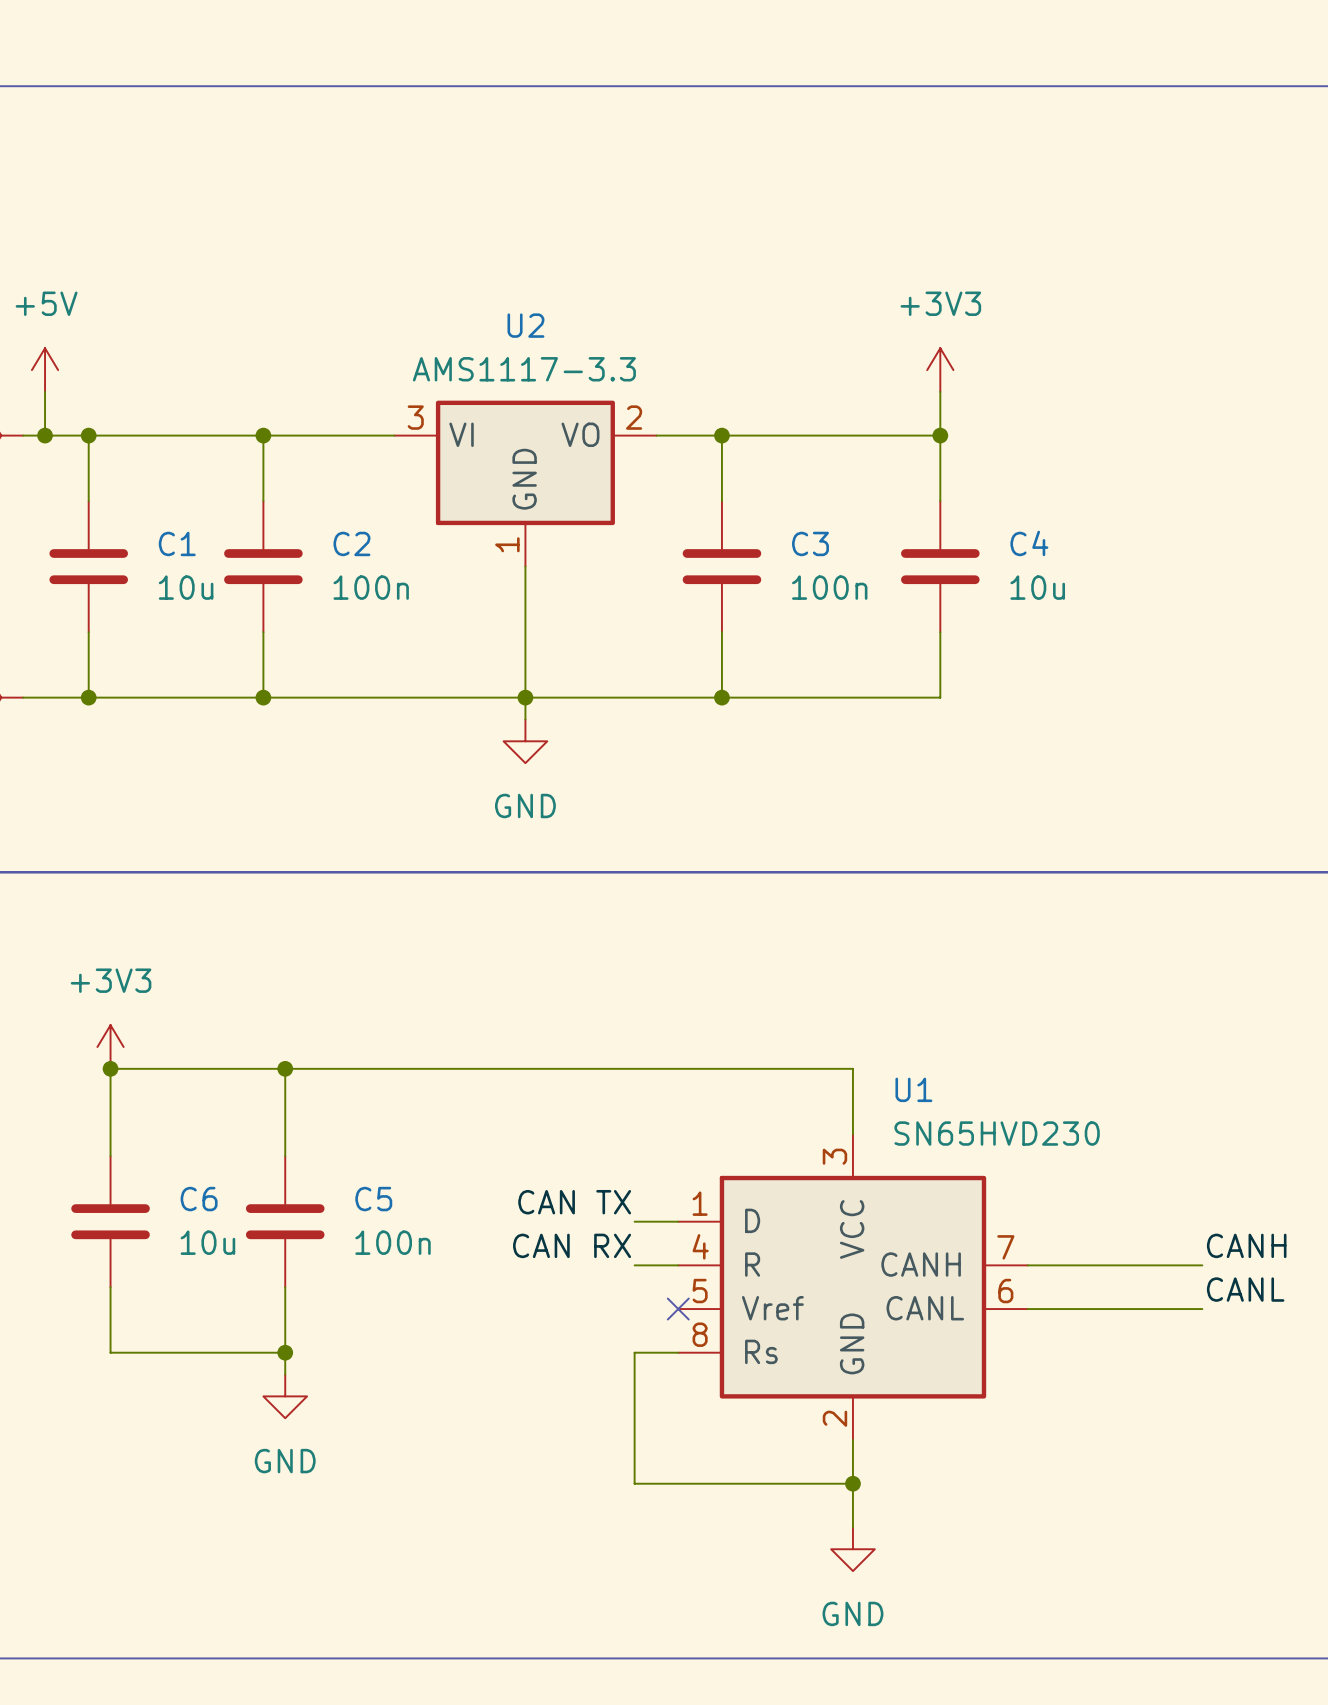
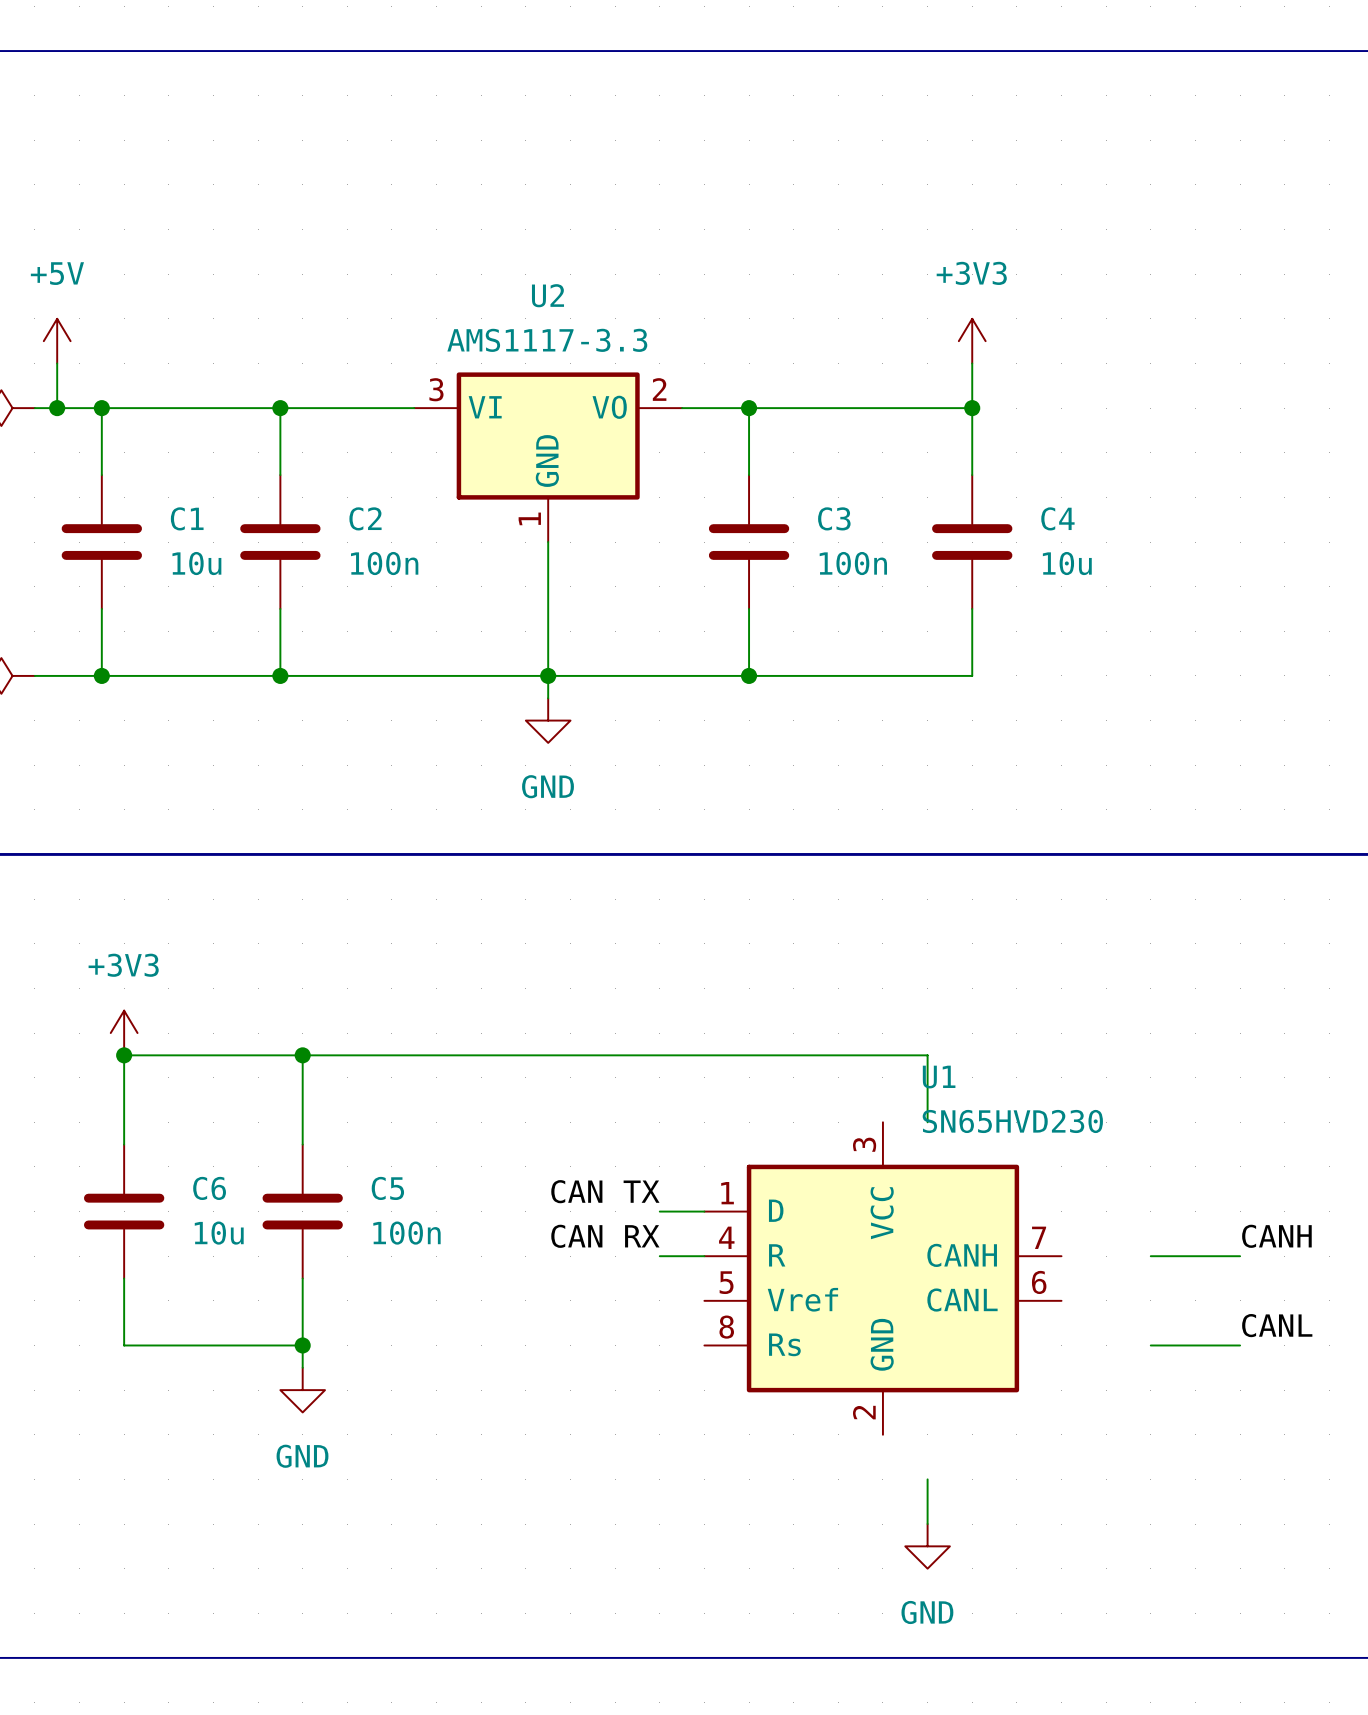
wire: (852, 1068) (852, 1134) -> (882, 1055) (927, 1055) (927, 1122)
wire: (1027, 1265) (1115, 1265) -> (1150, 1345) (1240, 1345)
label position: CANL (1245, 1289) -> CANL (1277, 1325)
no-connect mark: (678, 1309) -> none
wire: (1027, 1309) (1202, 1309) -> none
wire: (678, 1352) (634, 1352) (634, 1483) (852, 1483) -> none
wire: (852, 1440) (852, 1527) -> none
junction: (852, 1483) -> none
wire: none -> (927, 1479) (927, 1524)
power symbol position: GND (852, 1549) -> GND (927, 1546)

